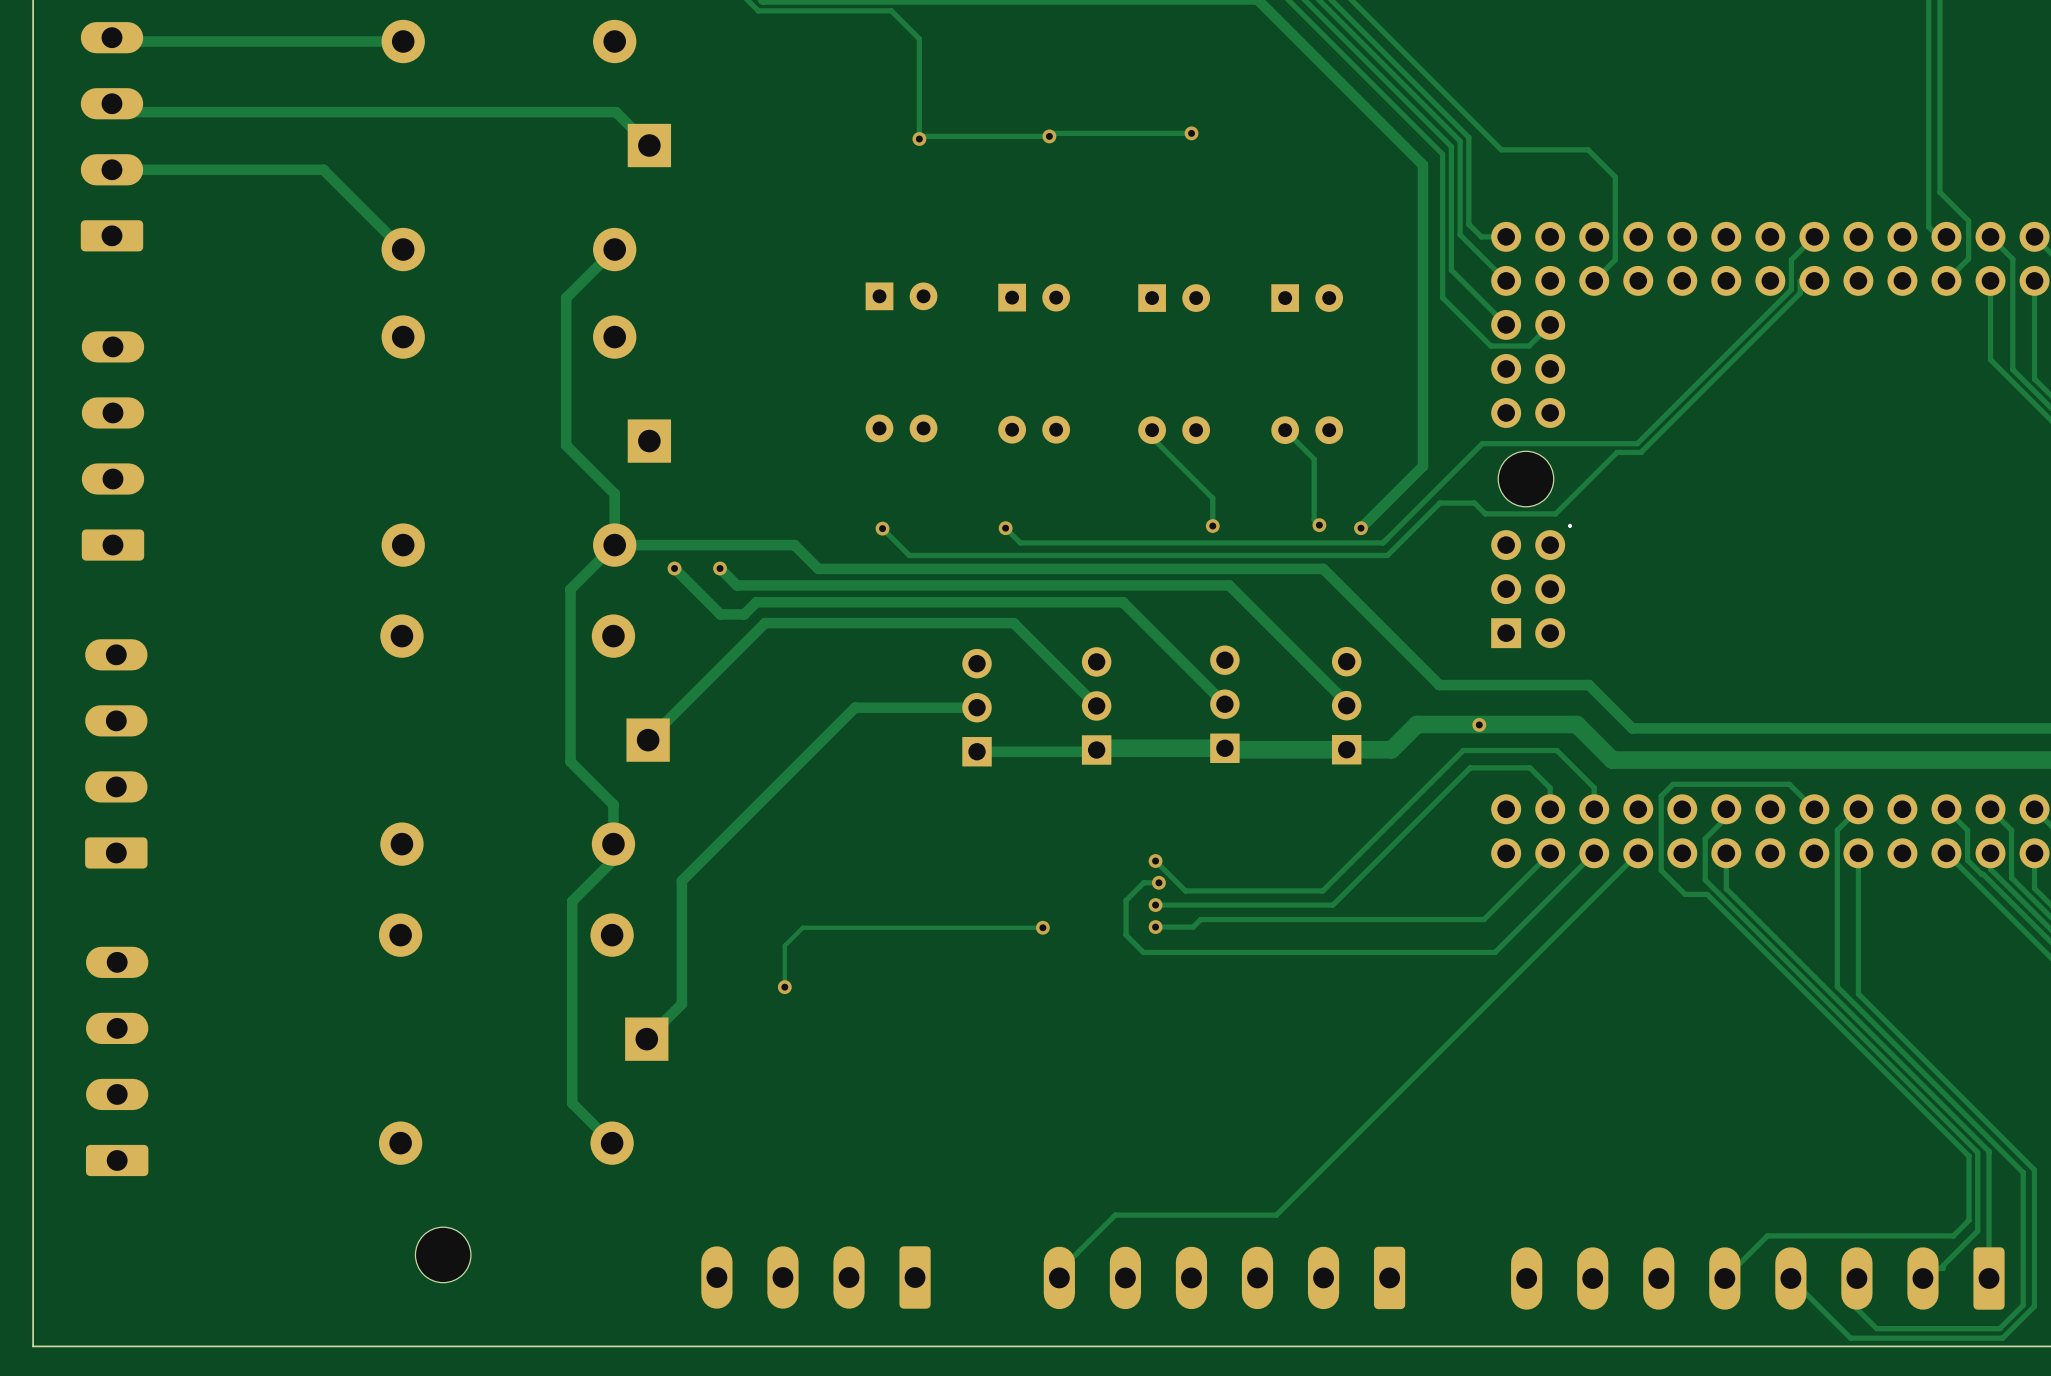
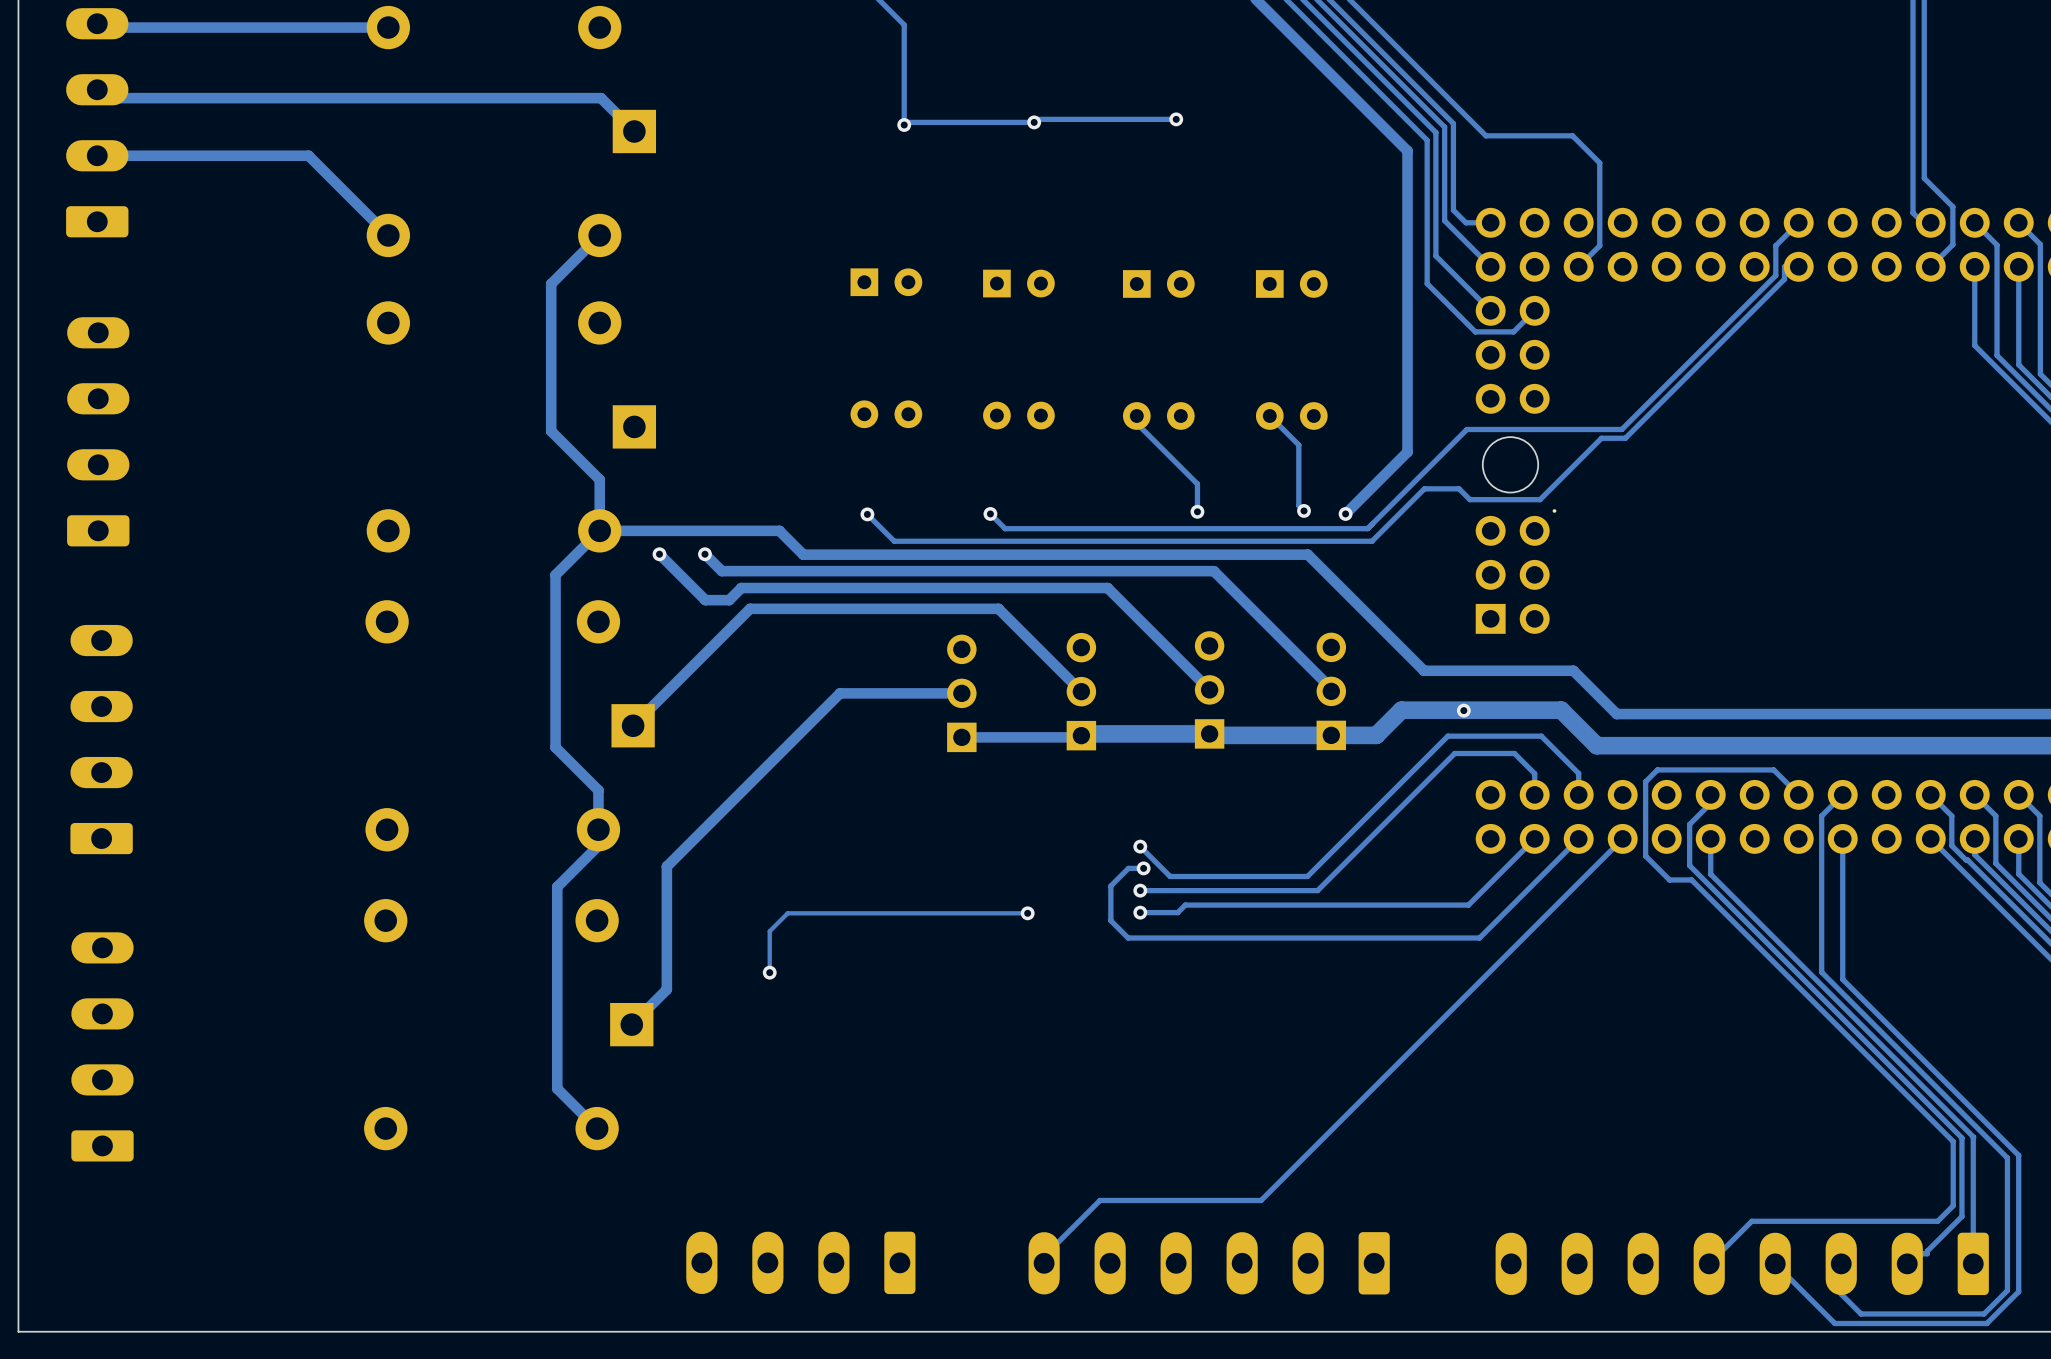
part: (443, 1254) -> none

